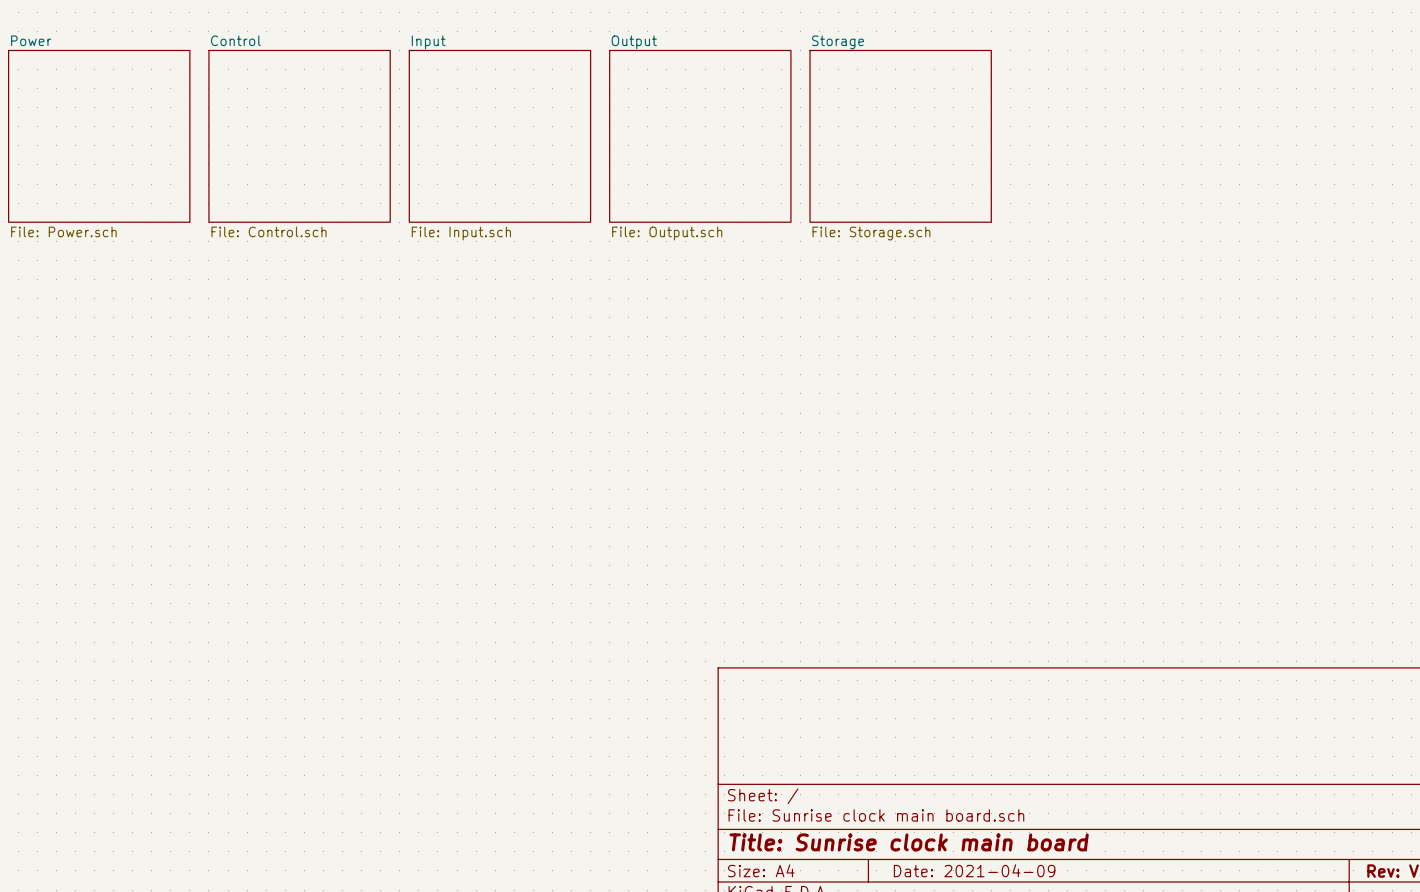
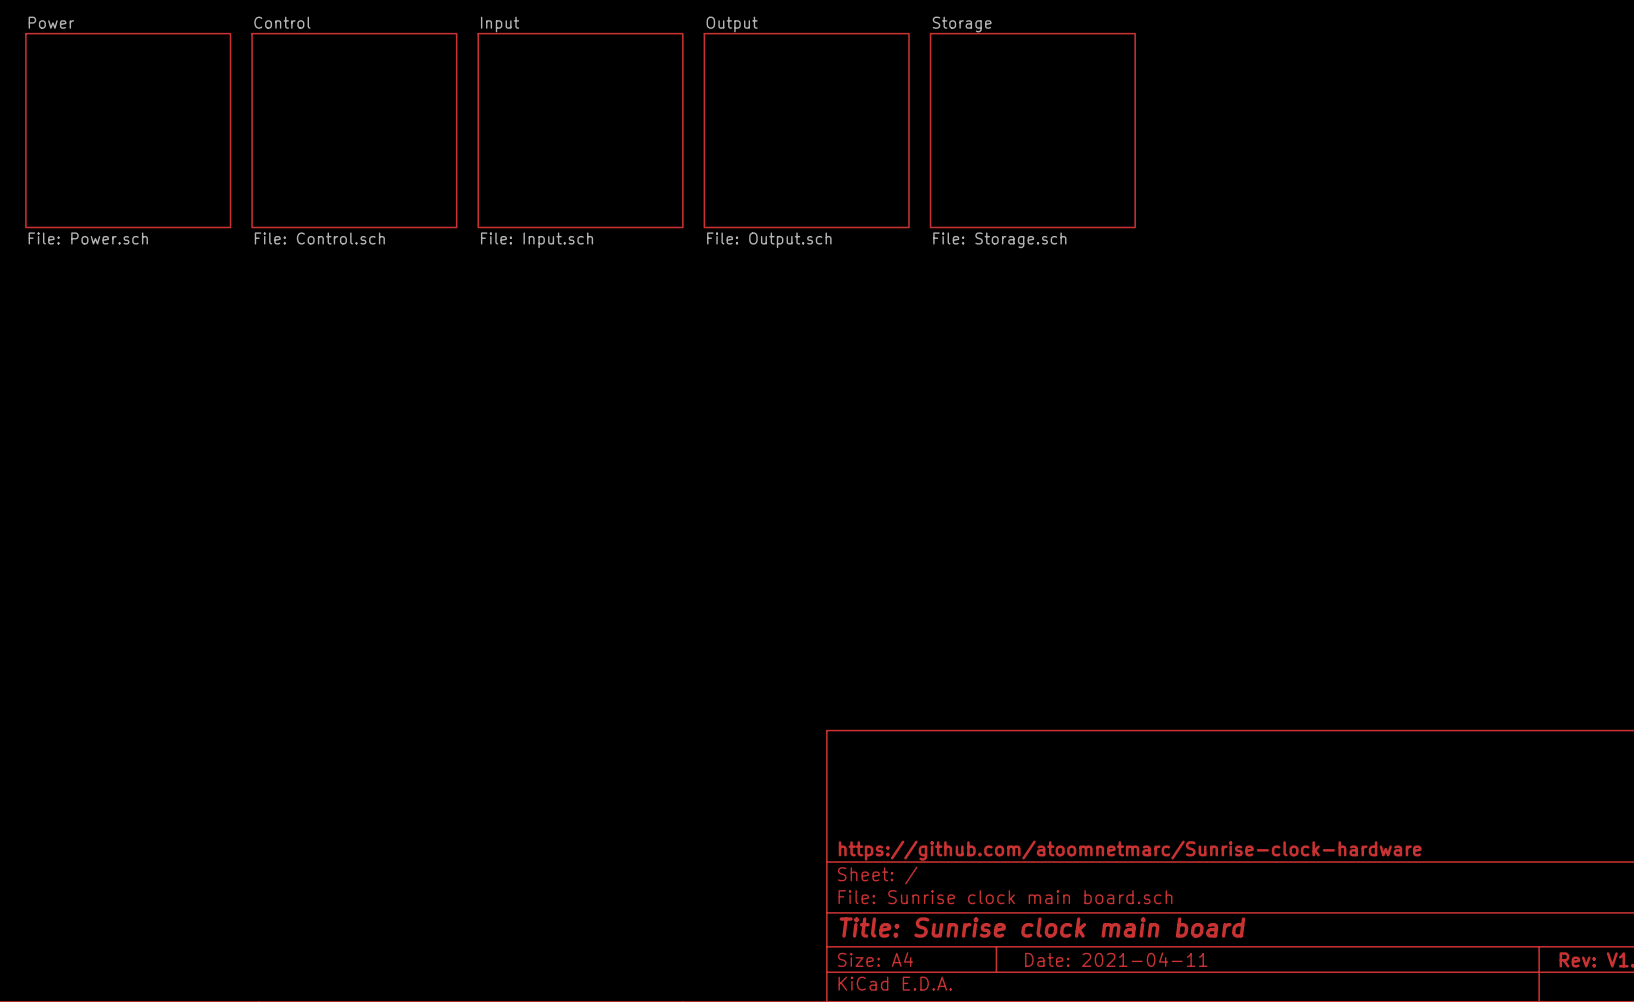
title block: none -> https://github.com/atoomnetmarc/Sunrise-clock-hardware (1130, 850)
title block: Date: 2021-04-09 (974, 870) -> Date: 2021-04-11 (1116, 959)

